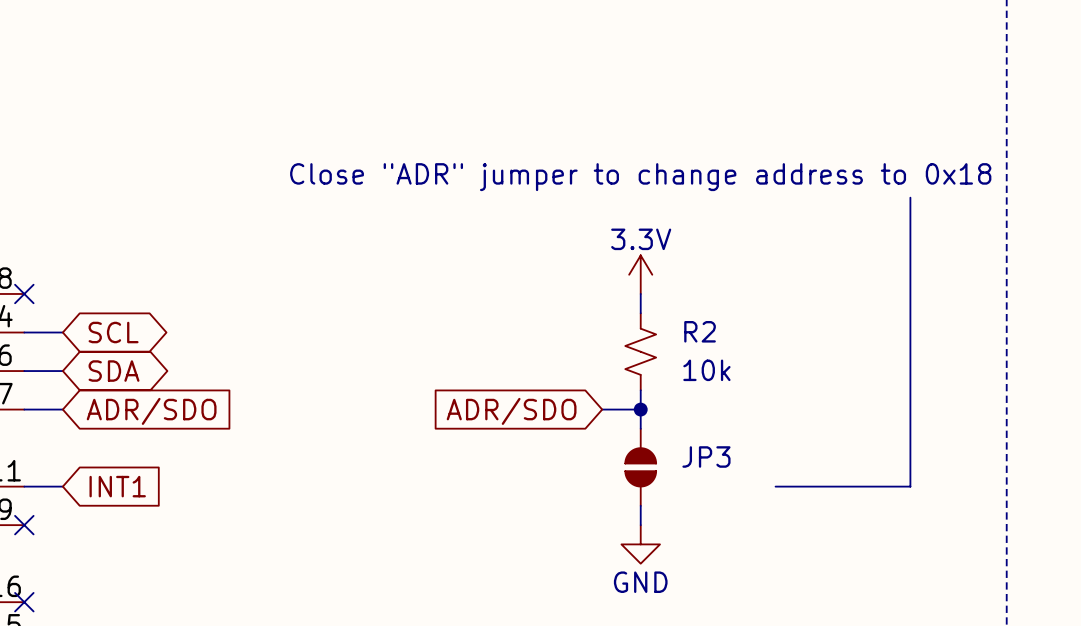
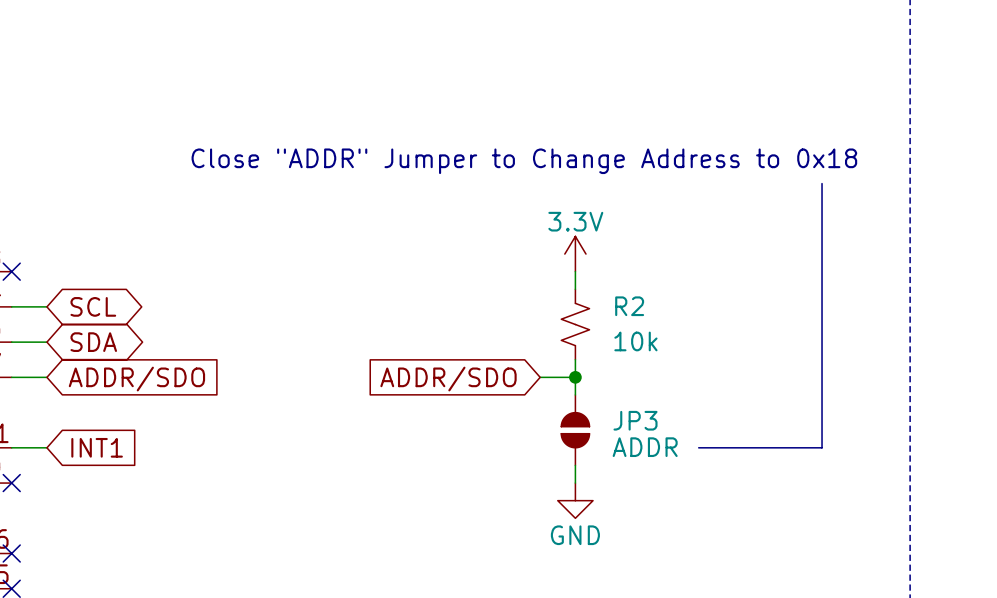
text: none -> Close "ADDR" Jumper to Change Address to 0x18 (524, 161)
text: Close "ADR" jumper to change address to 0x18 (640, 177) -> none
global label: ADR/SDO (151, 411) -> ADDR/SDO (136, 379)
global label: ADR/SDO (511, 411) -> ADDR/SDO (448, 379)
JP3 value: none -> ADDR (645, 447)

